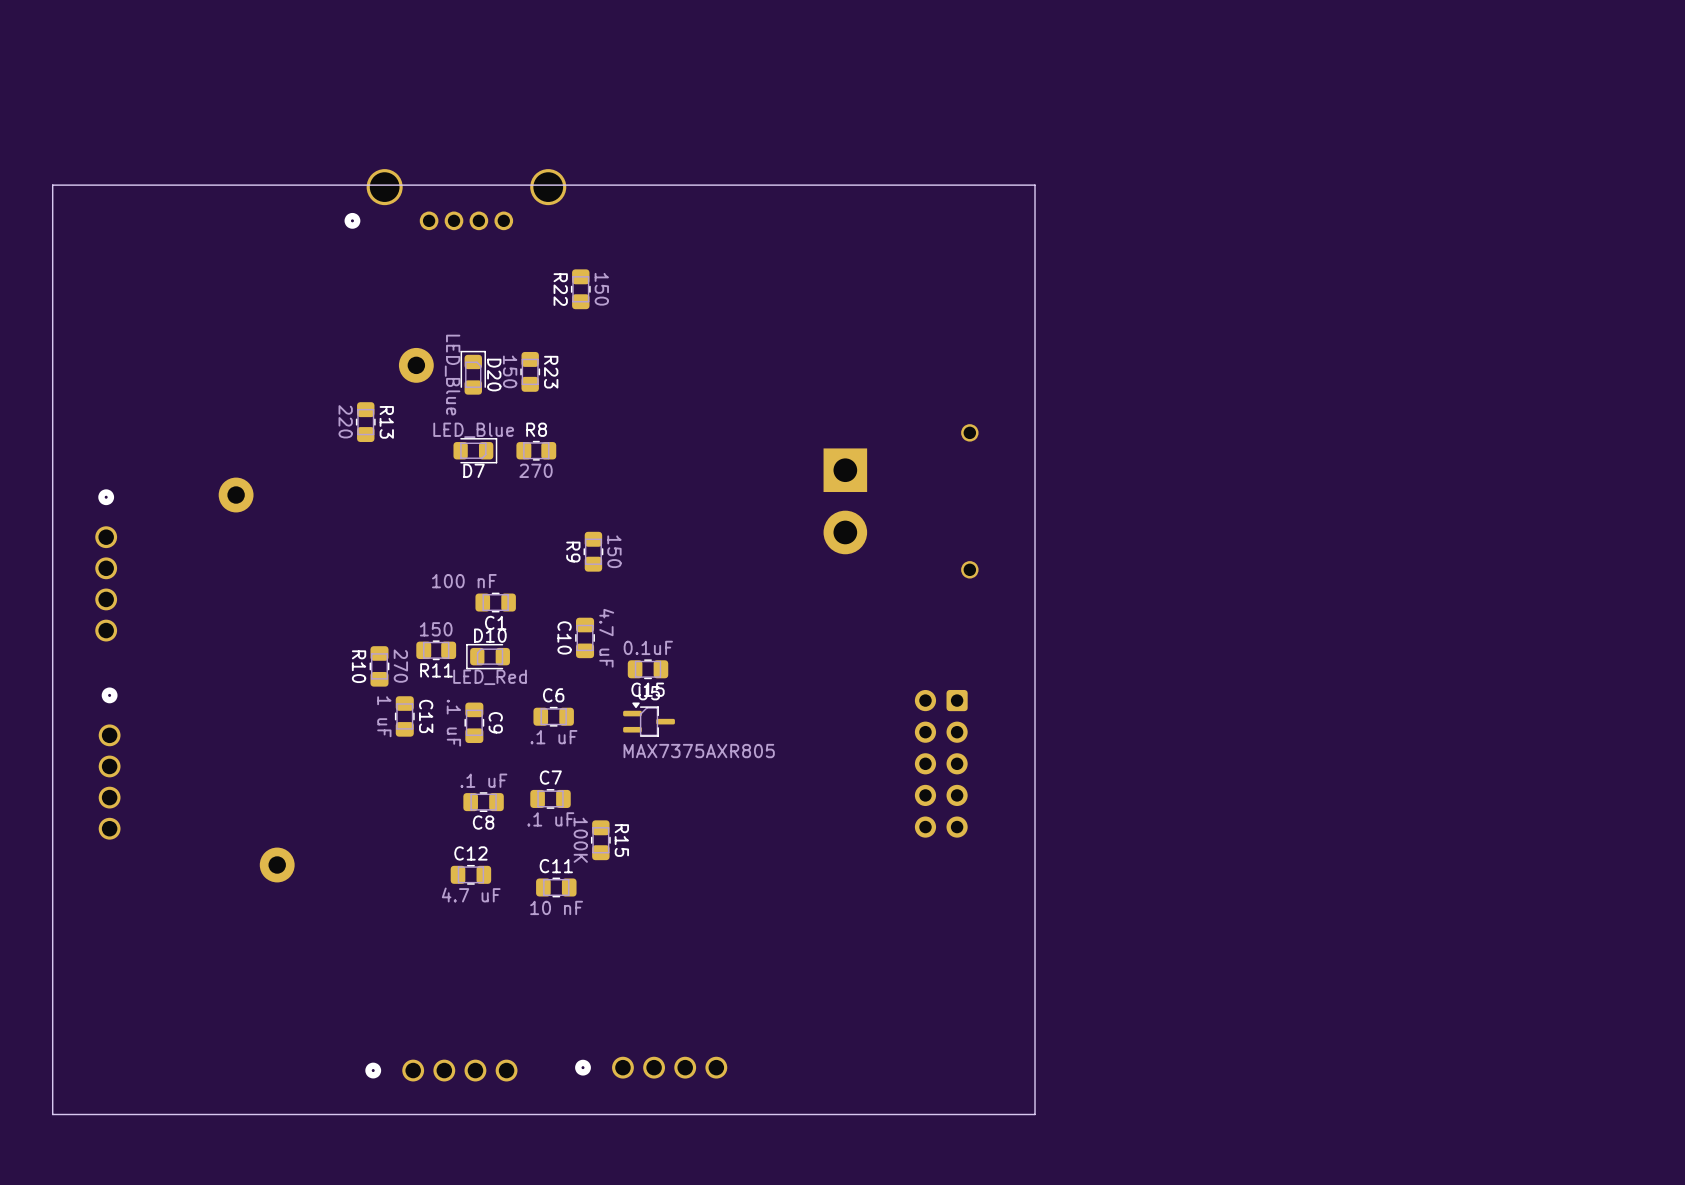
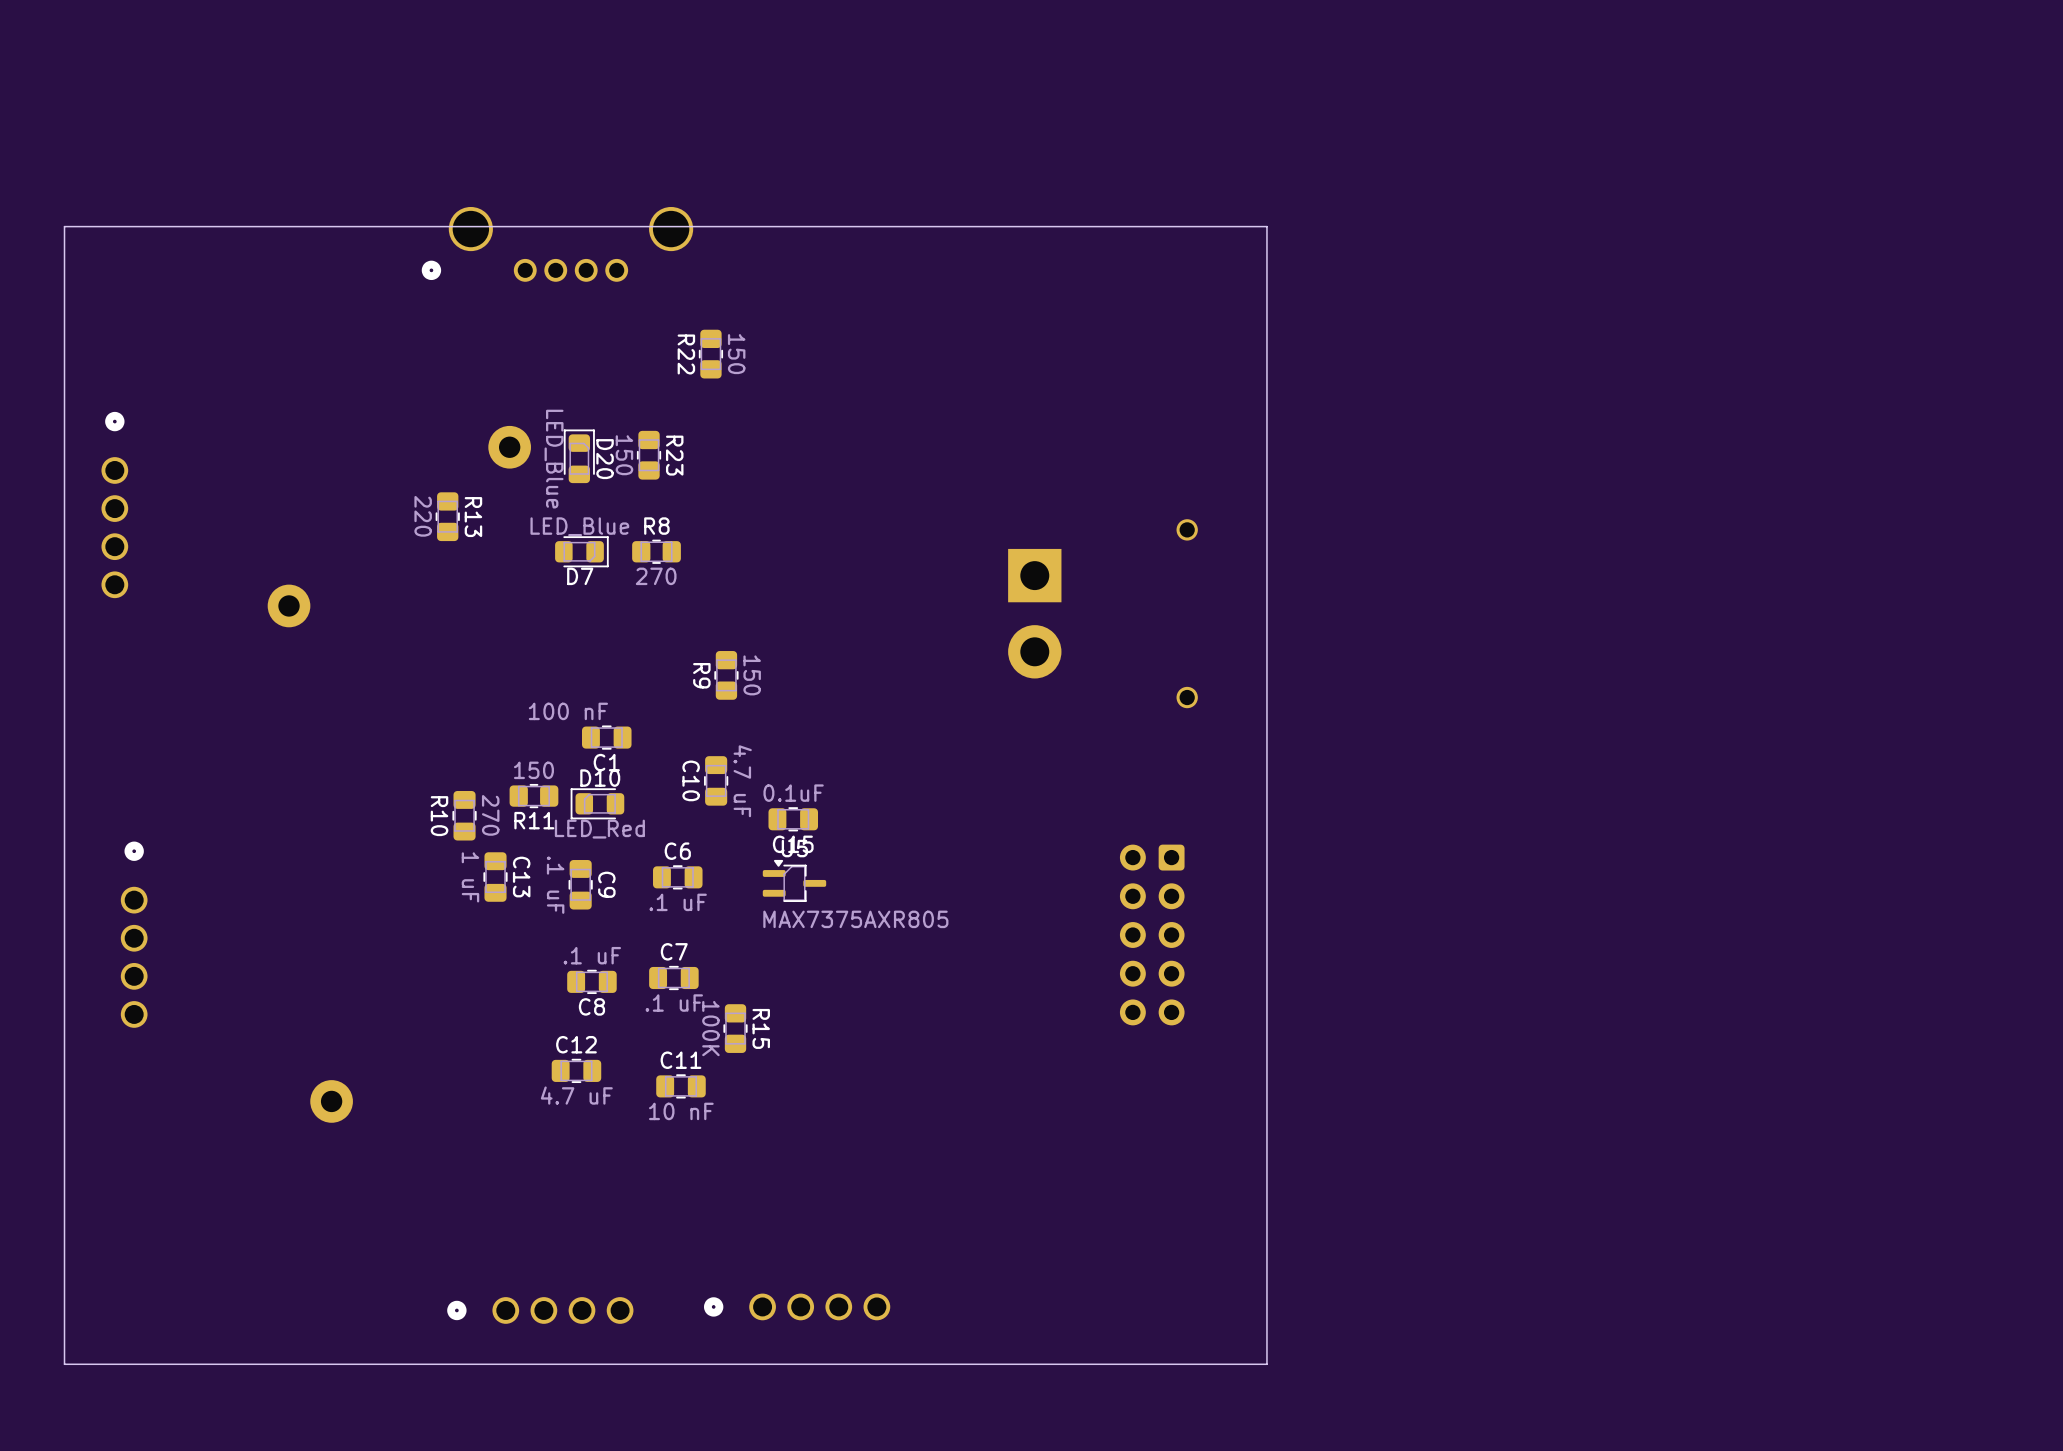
part position: (106, 565) -> (114, 505)
part position: (277, 865) -> (331, 1101)

